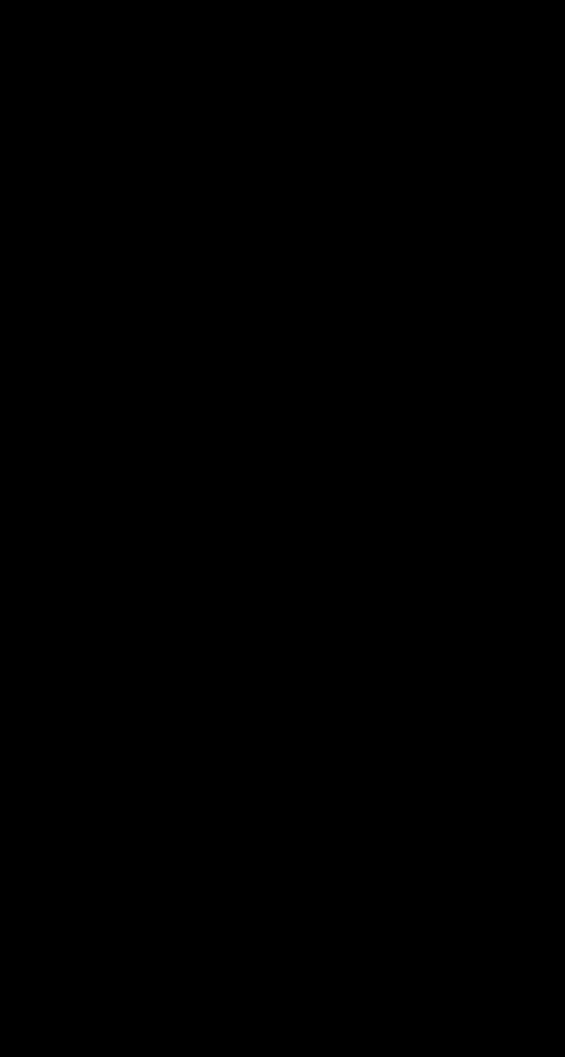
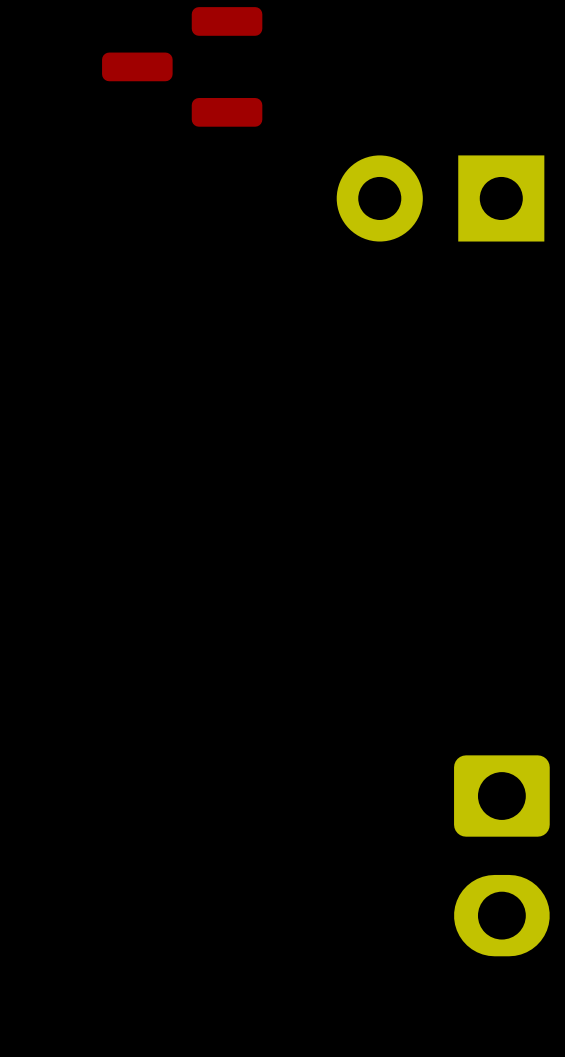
part: none -> (182, 66)
part: none -> (440, 198)
part: none -> (501, 855)

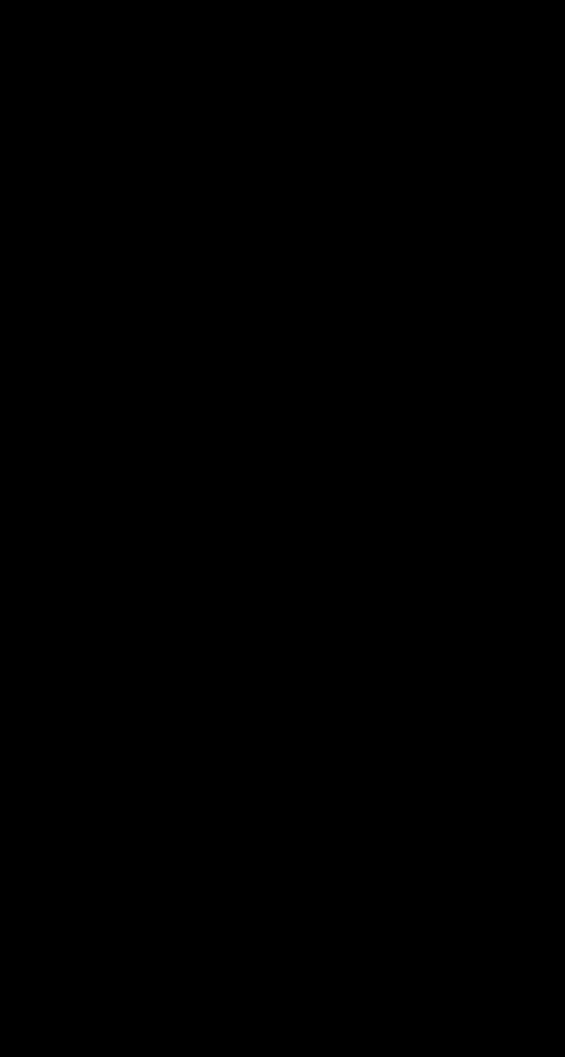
part: (182, 66) -> none
part: (440, 198) -> none
part: (501, 855) -> none

